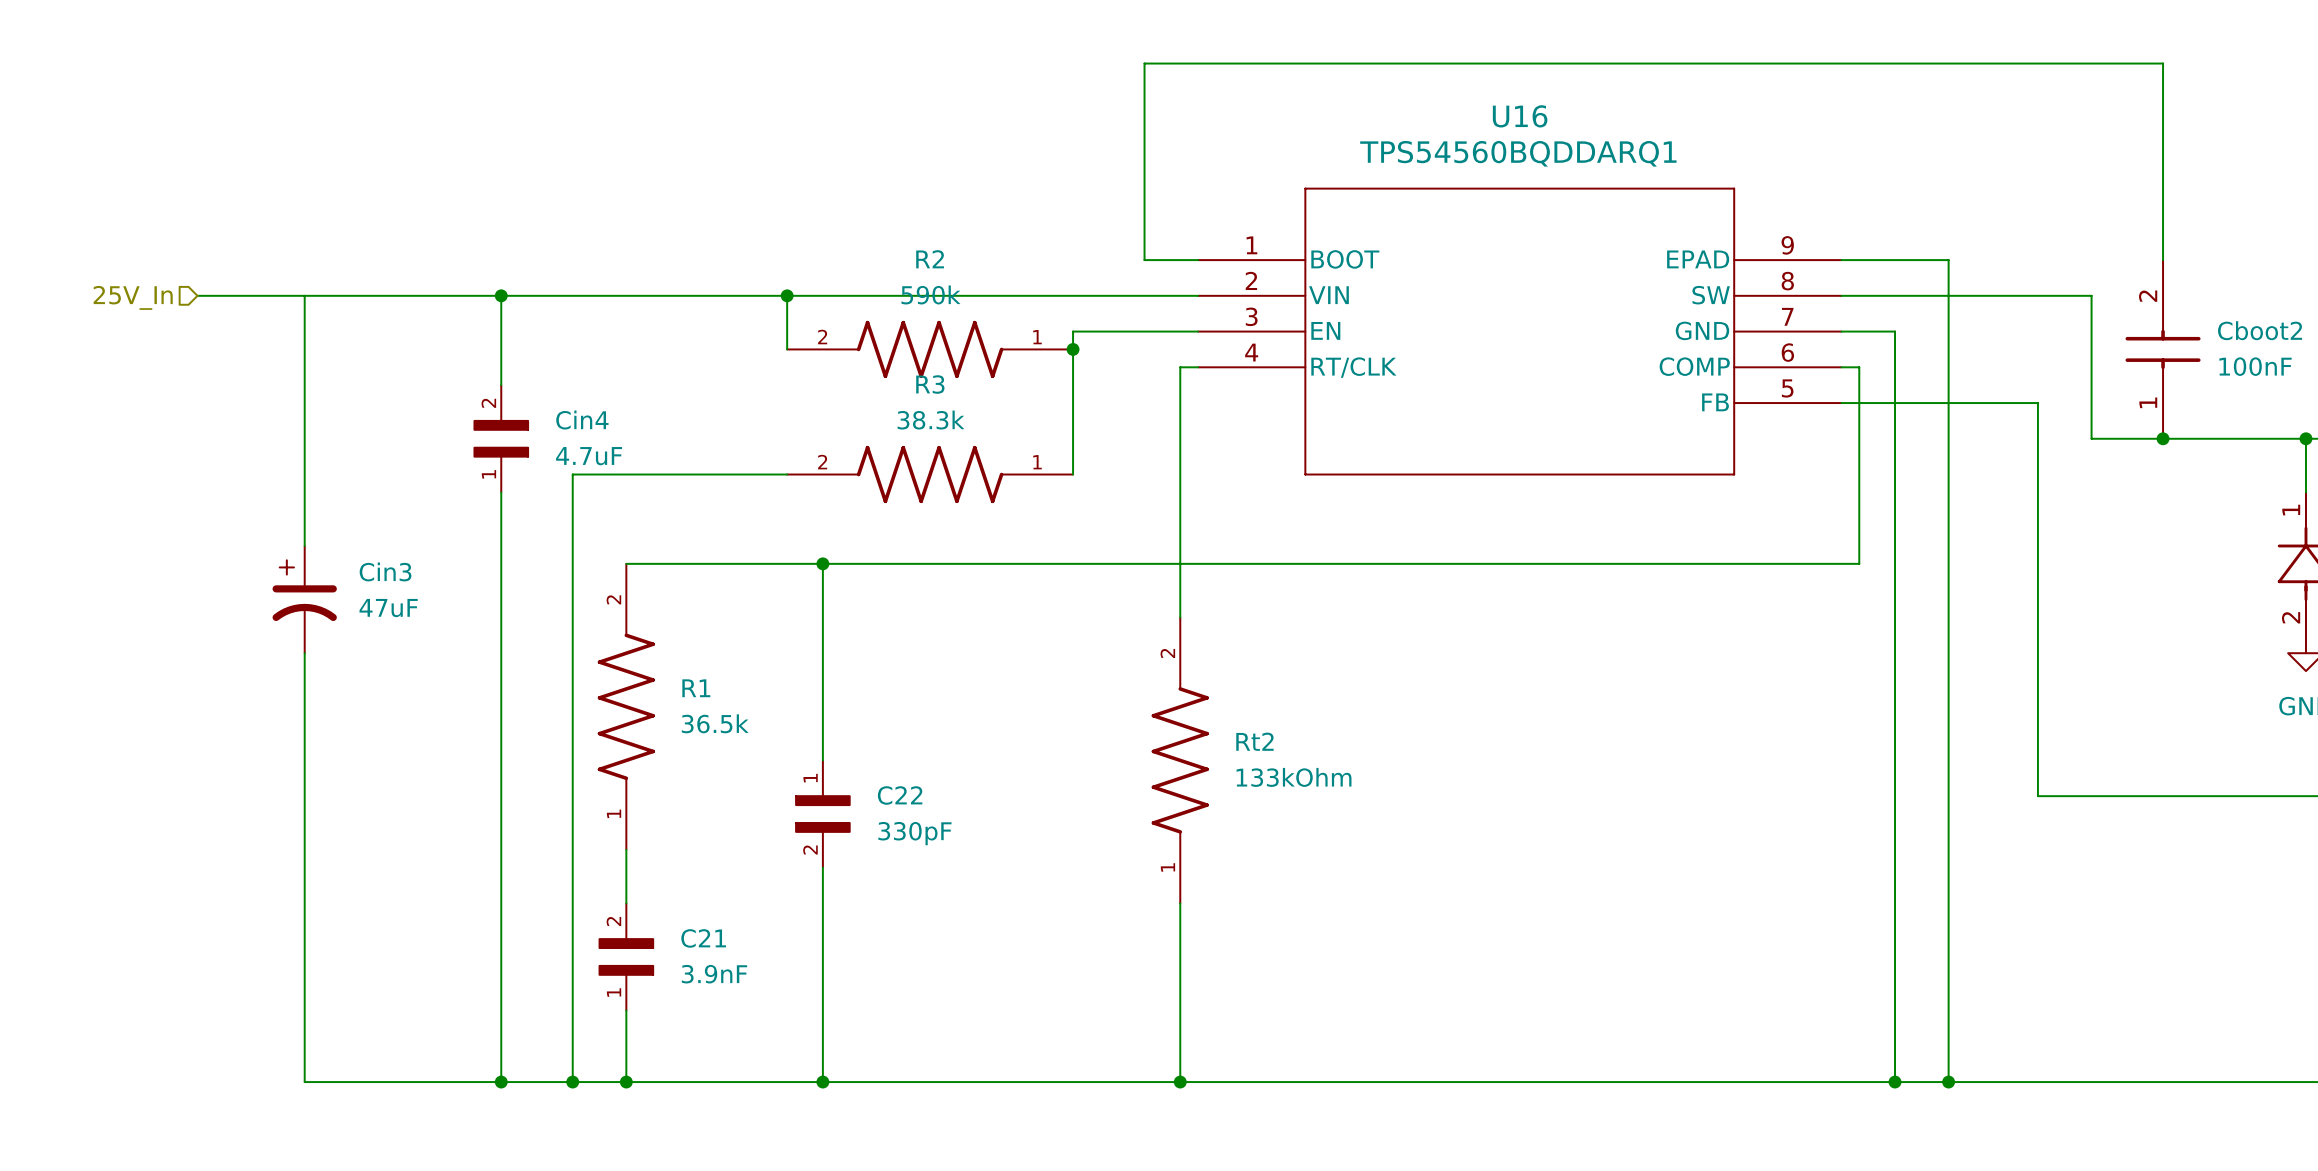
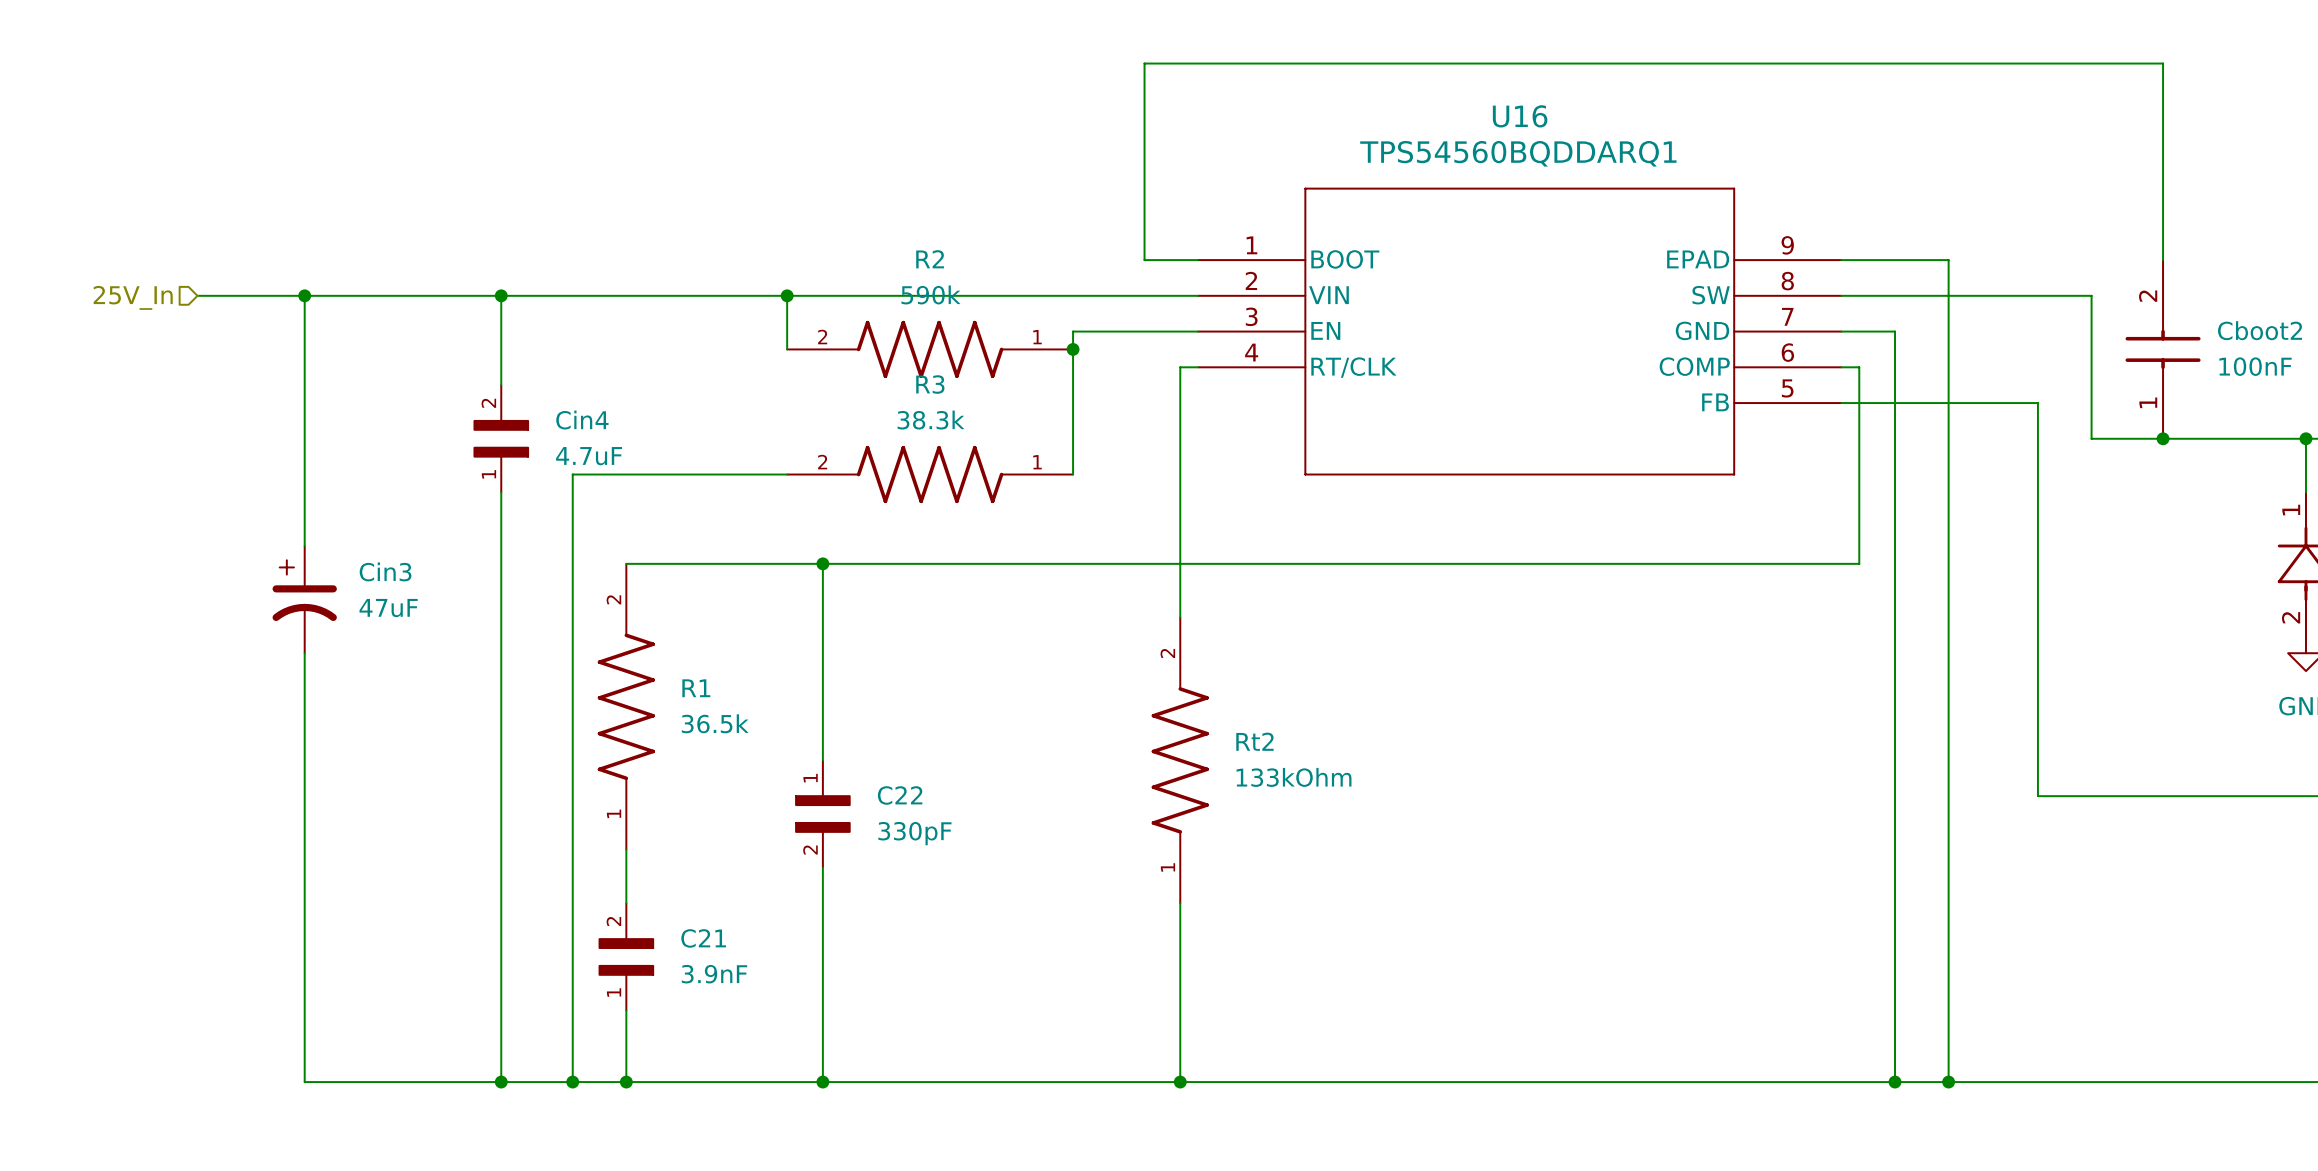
junction: none -> (304, 295)

